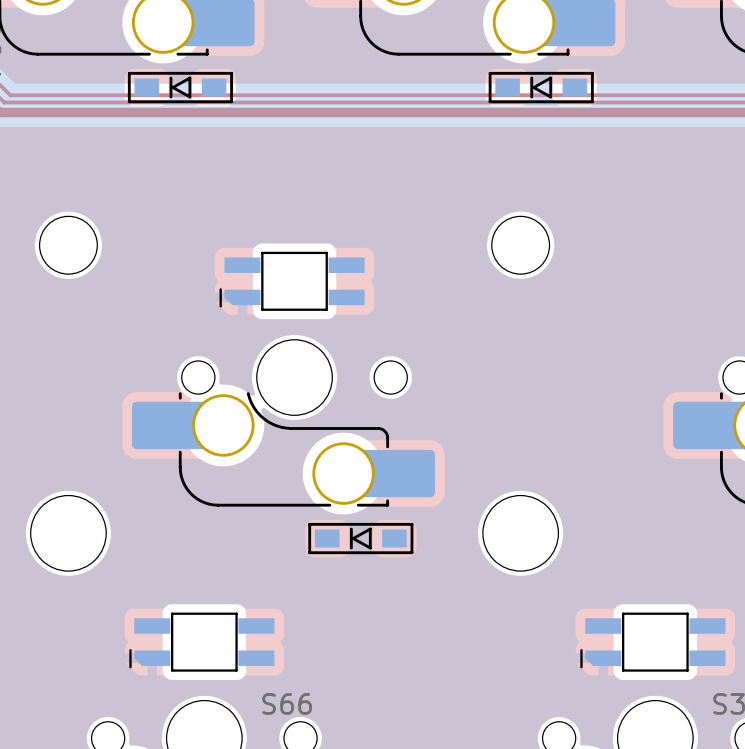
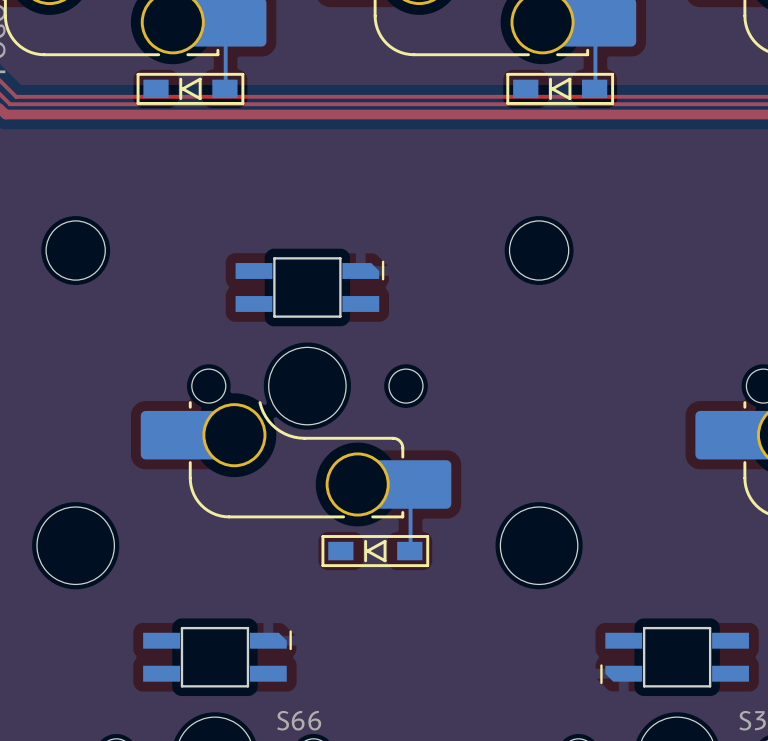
bottom track: none -> (225, 22) (224, 88)
bottom track: none -> (595, 22) (594, 88)
part rotation: 0° (292, 281) -> 180° (309, 287)
bottom track: none -> (410, 484) (409, 551)
part rotation: 0° (201, 642) -> 180° (217, 657)

